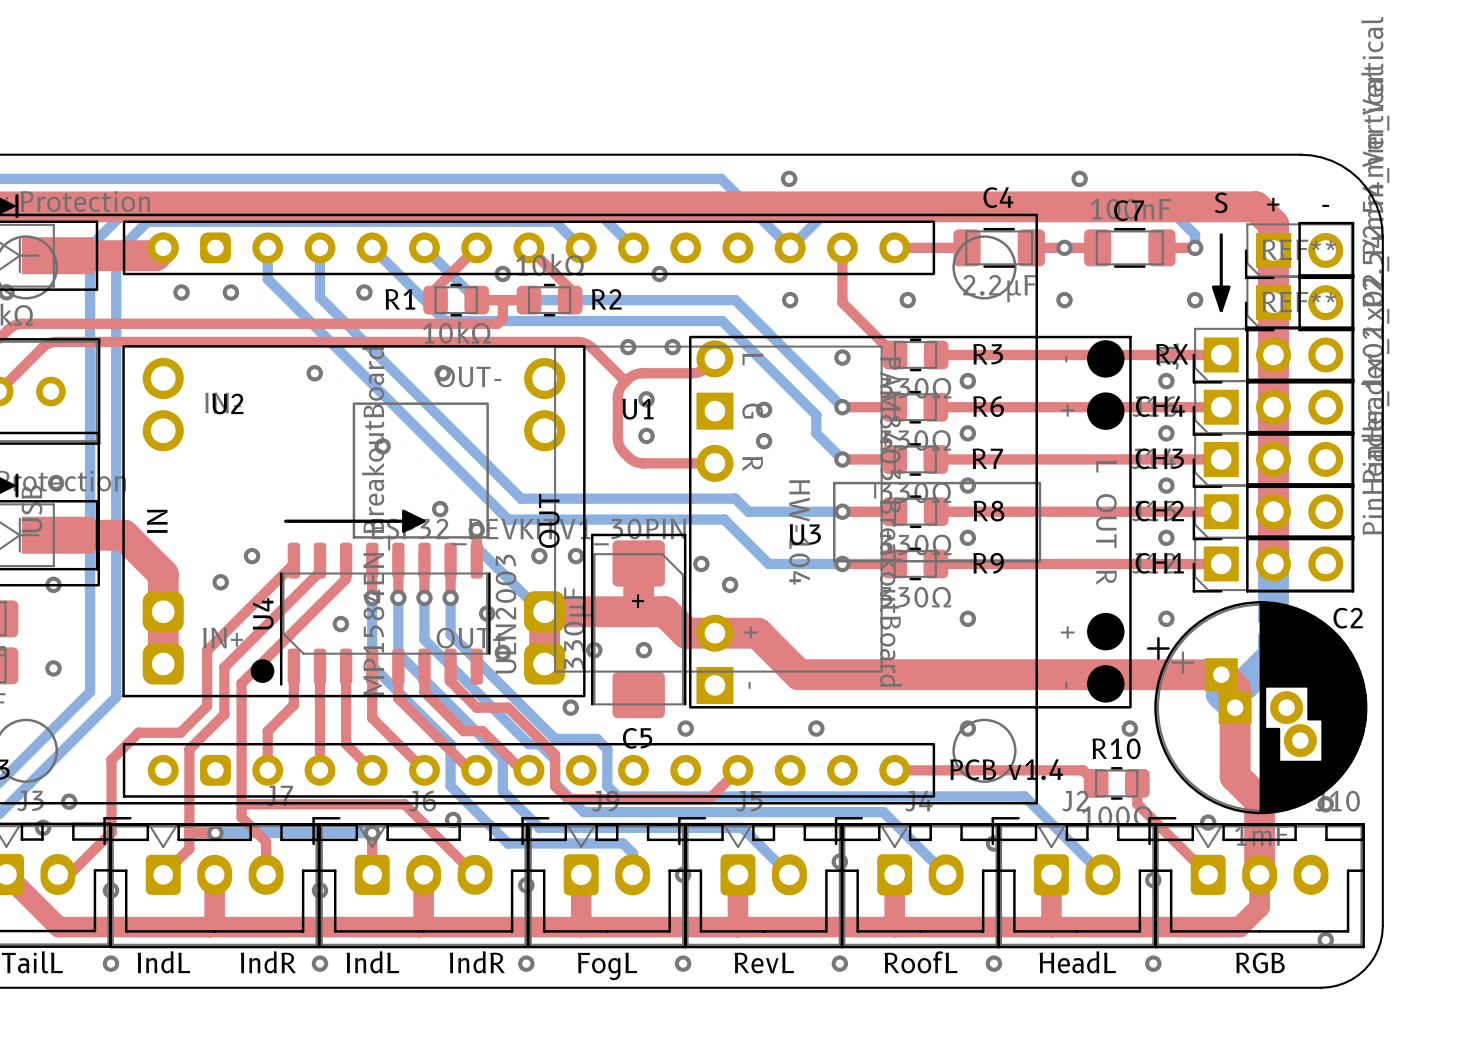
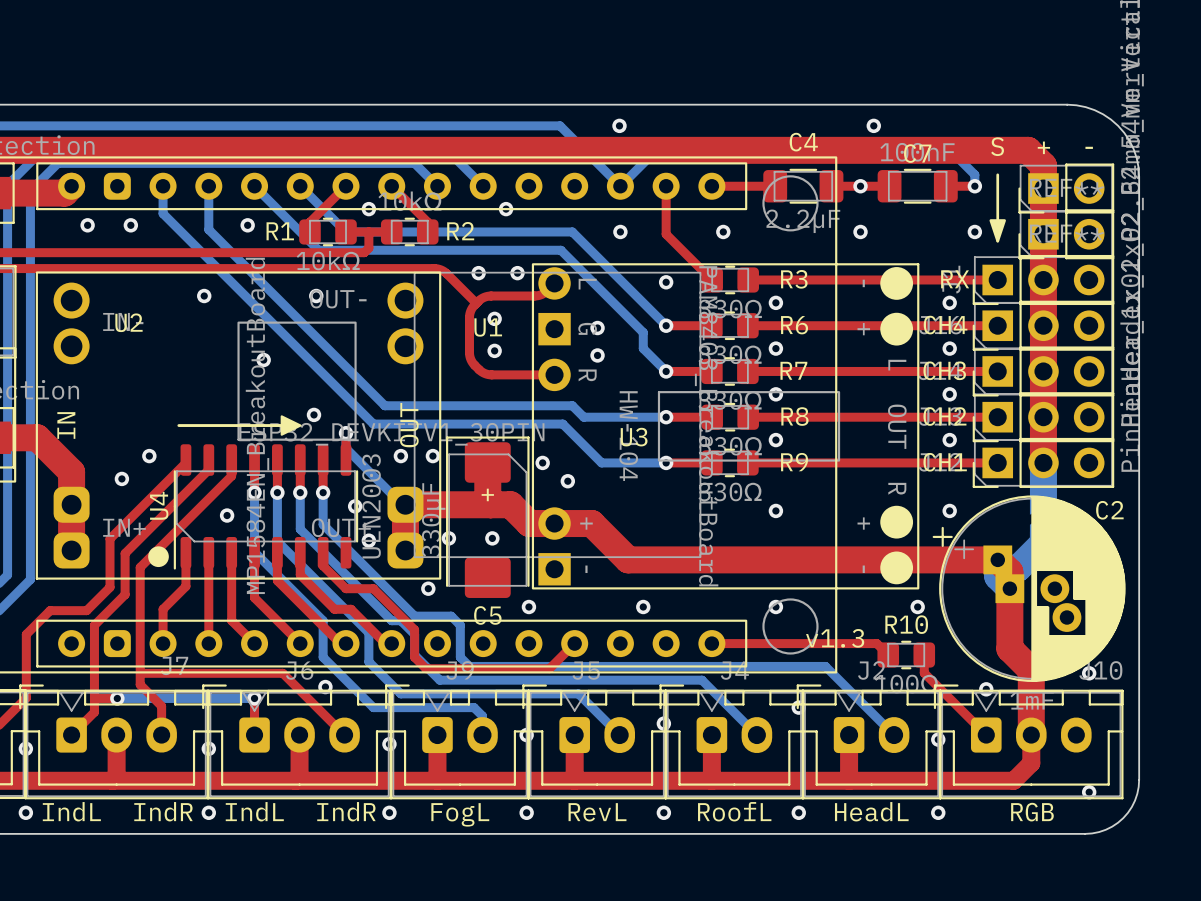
text: none -> v1.3 (835, 638)
text: PCB v1.4 (1006, 769) -> none

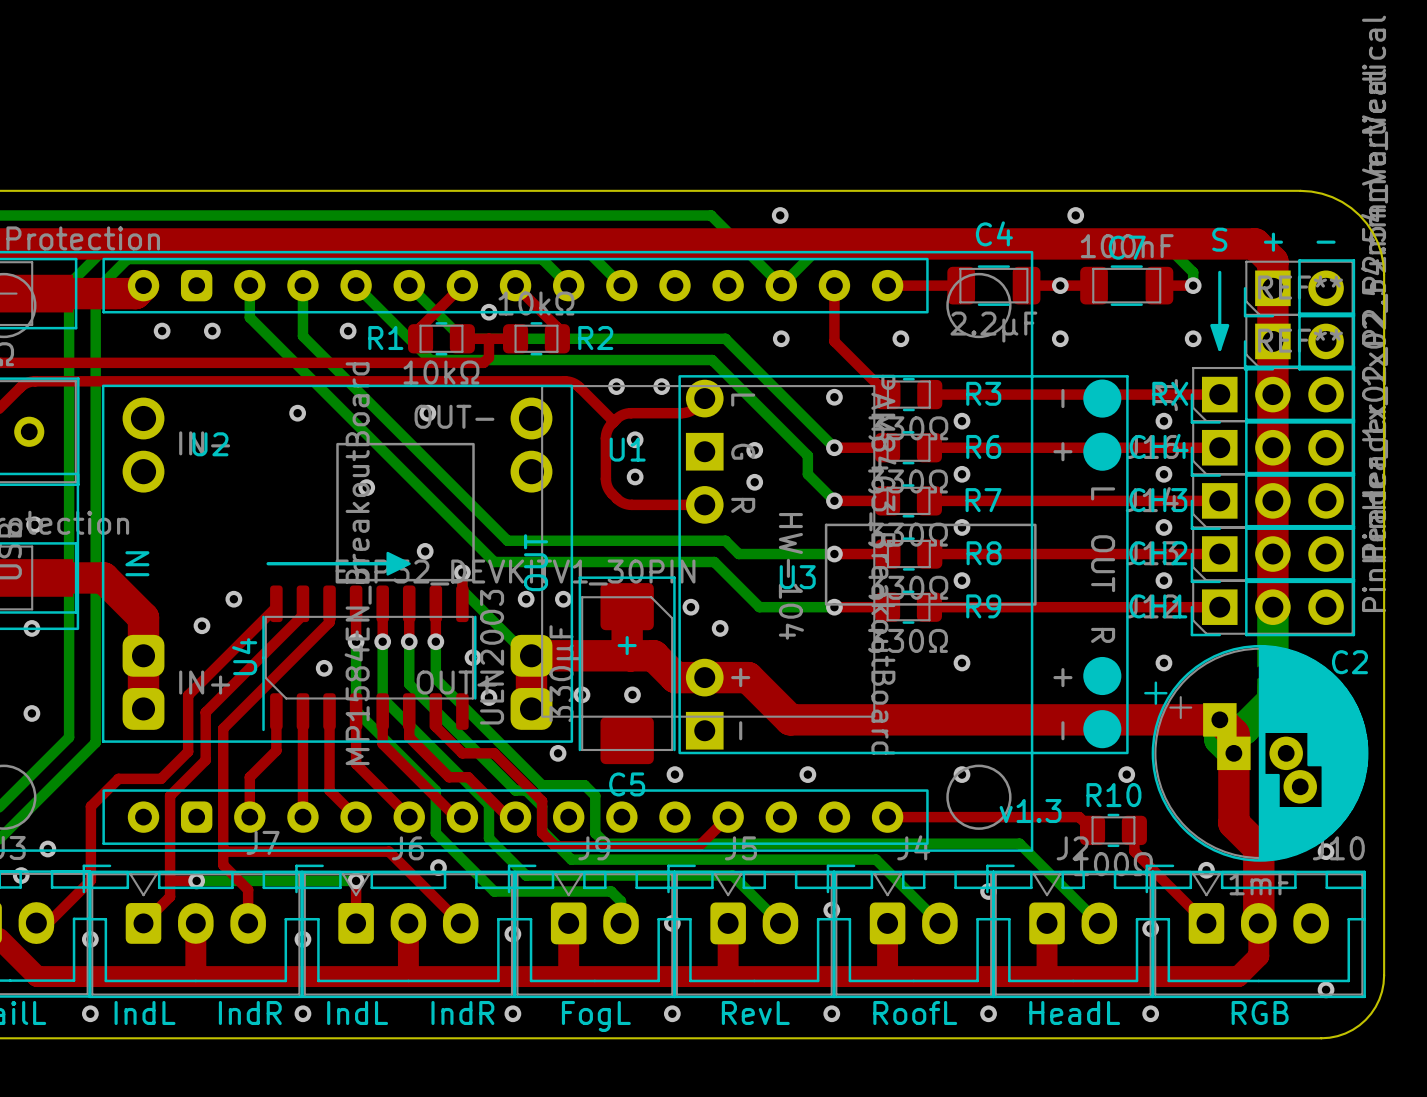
via: (506, 209) -> none
drawing: [148, 546, 169, 568] -> none

